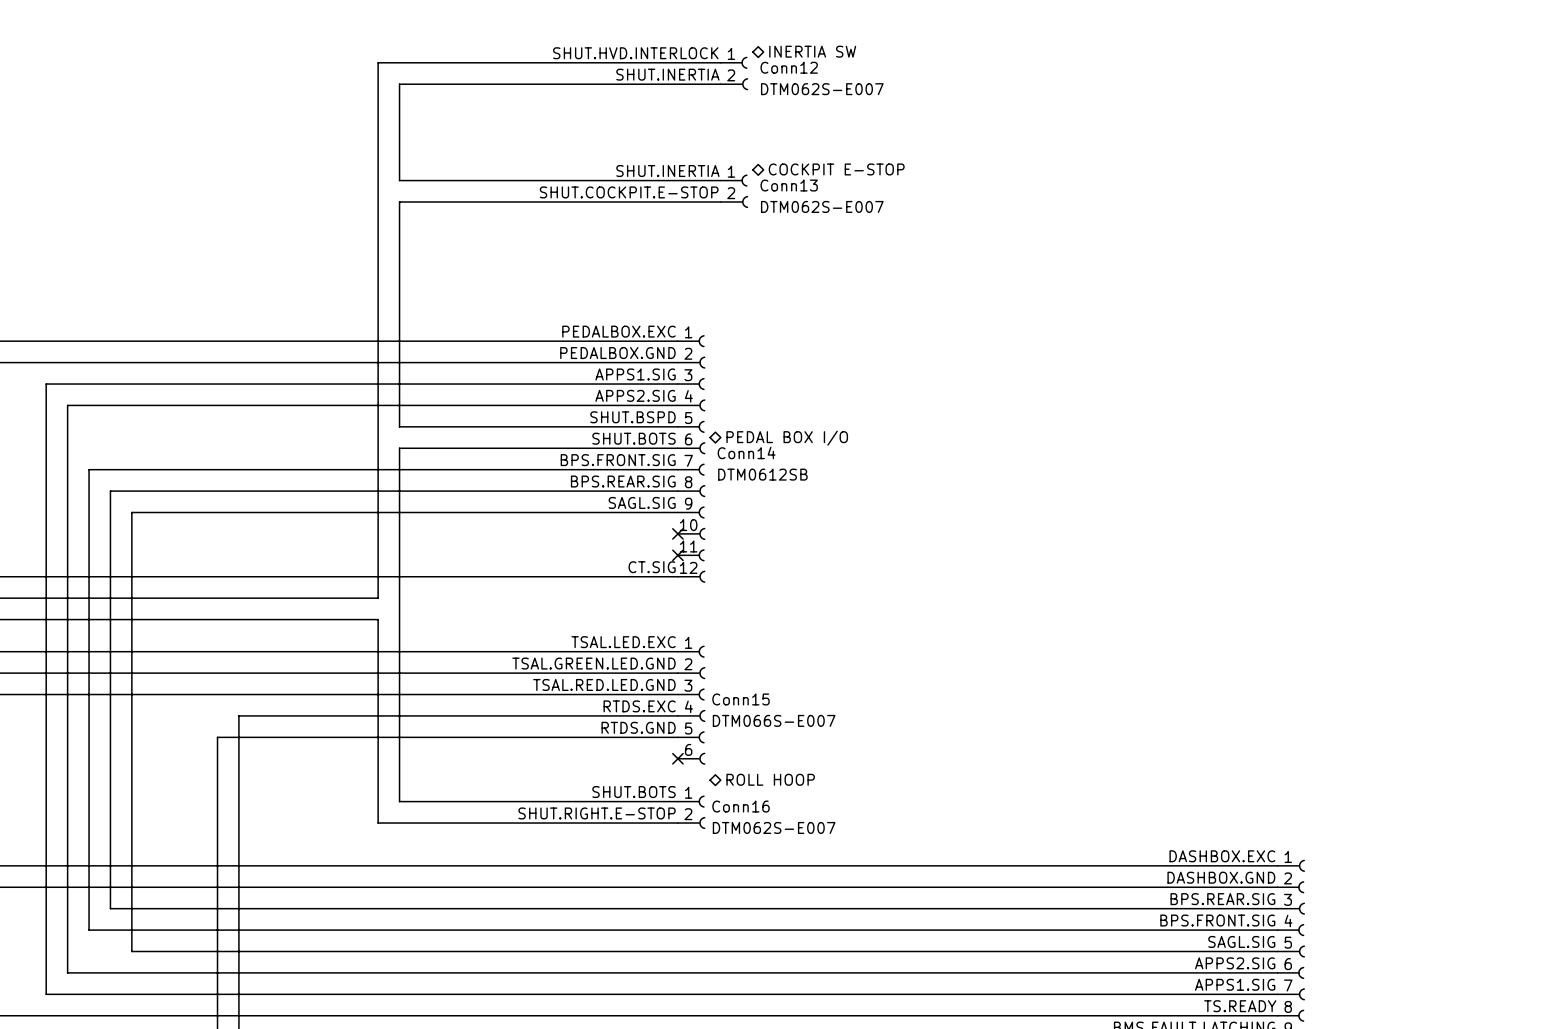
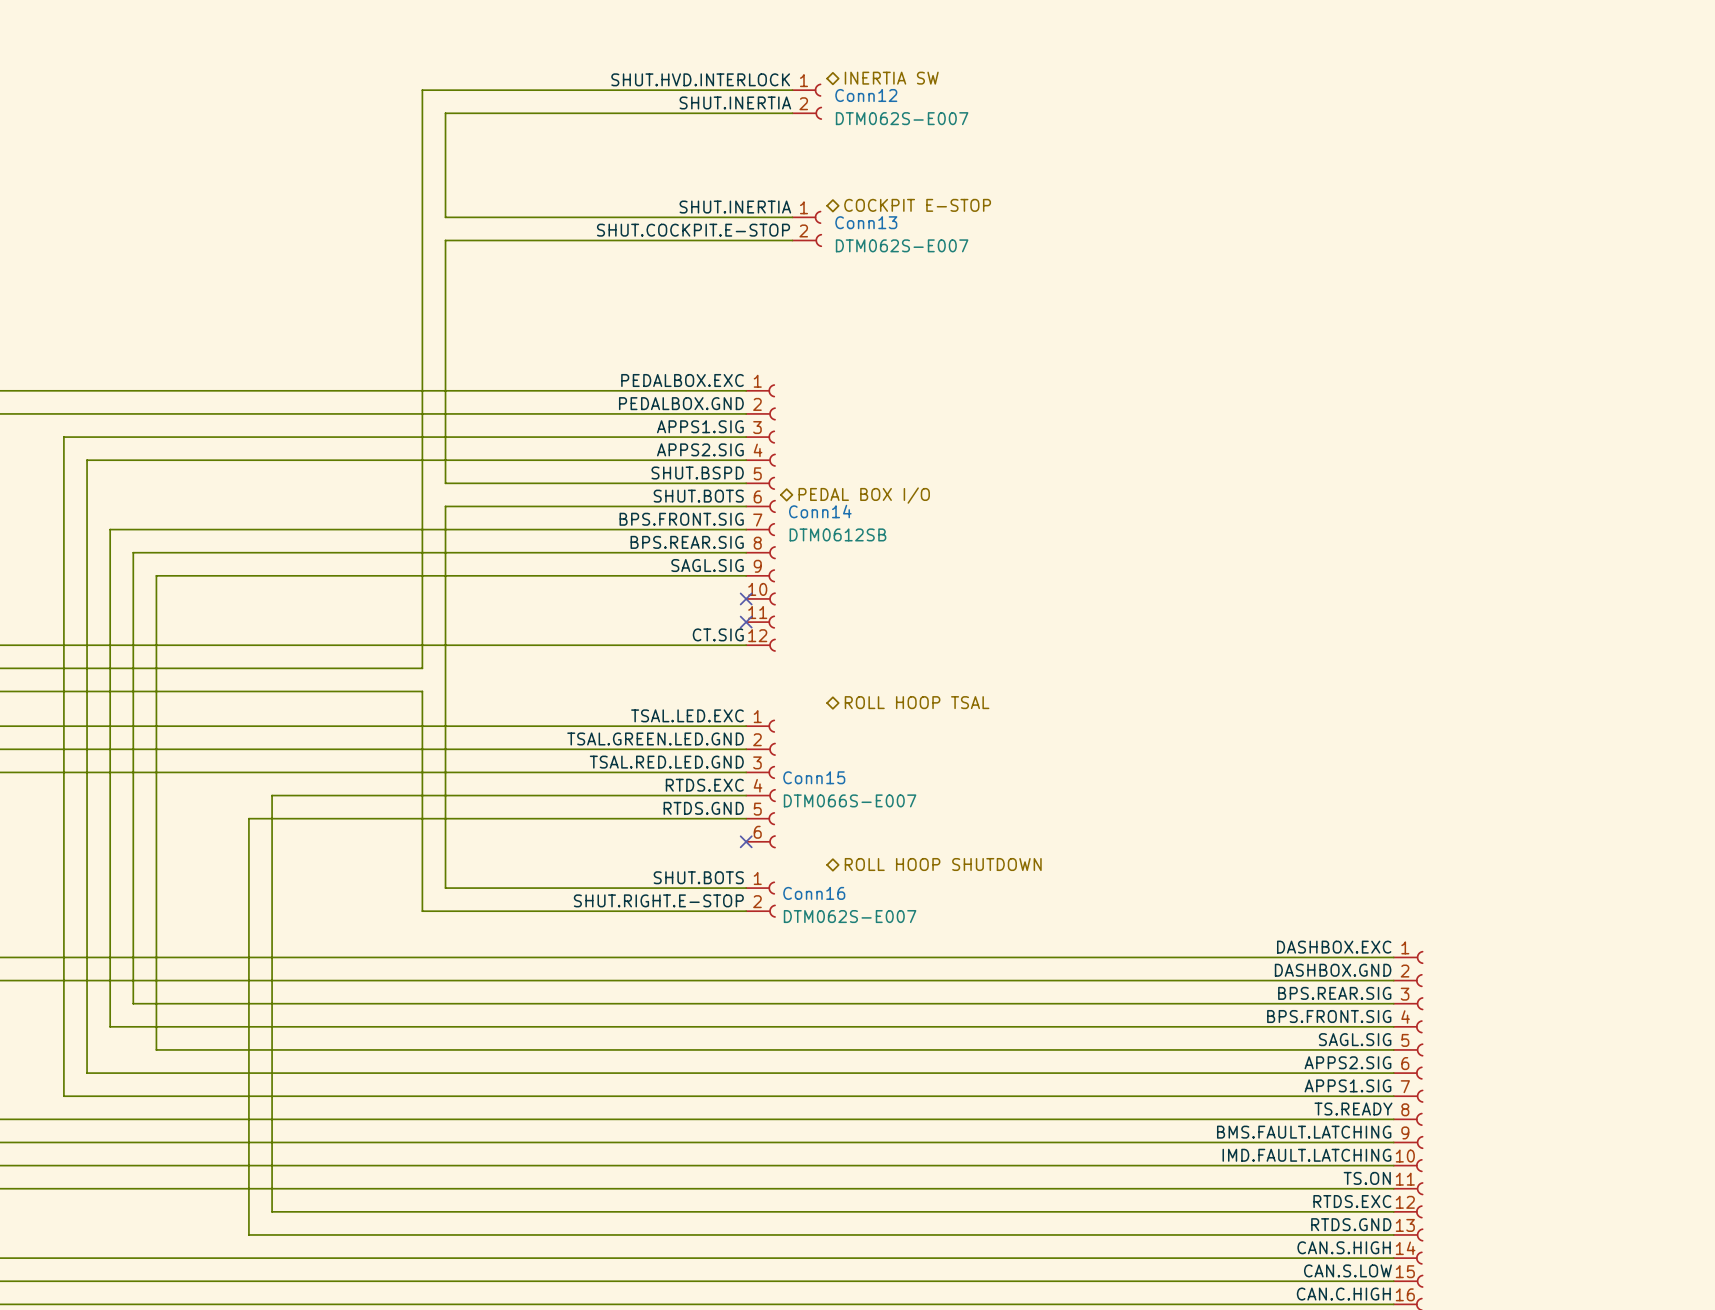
hierarchical label: none -> ROLL HOOP TSAL (917, 702)
hierarchical label: ROLL HOOP (770, 779) -> ROLL HOOP SHUTDOWN (943, 864)

